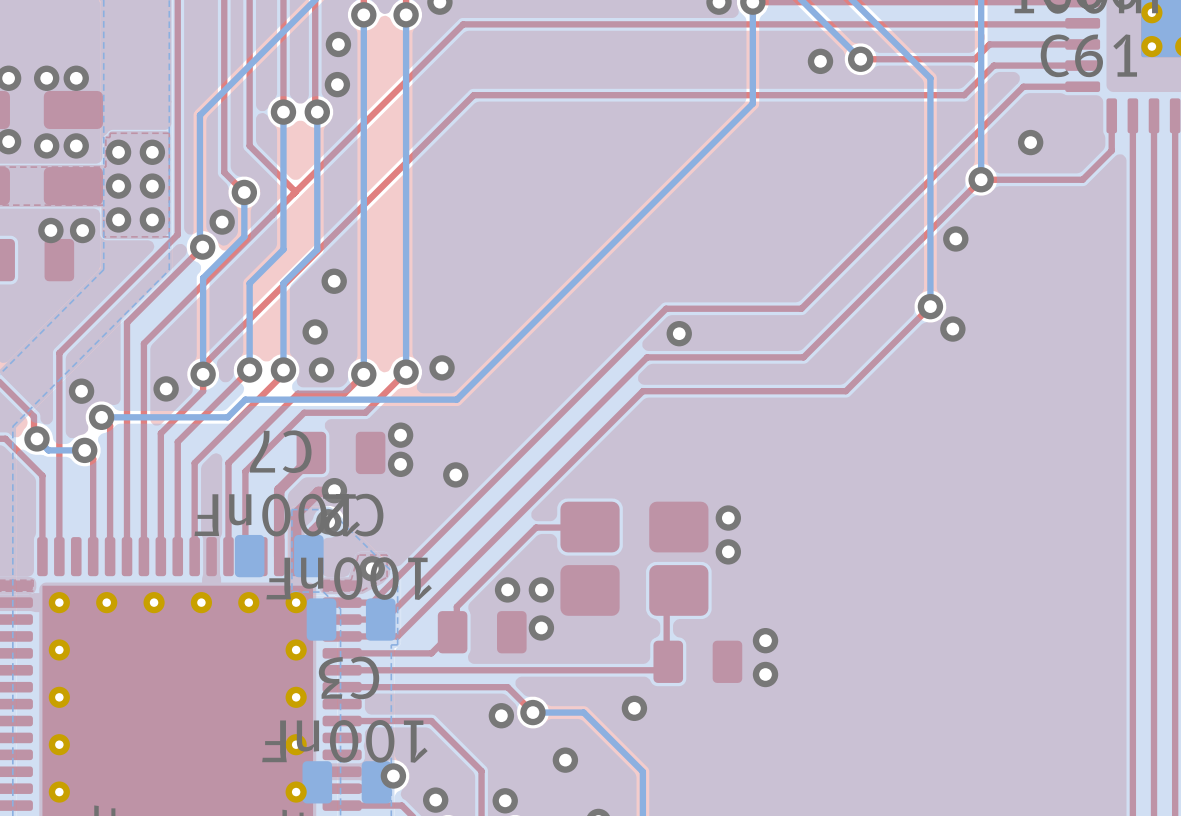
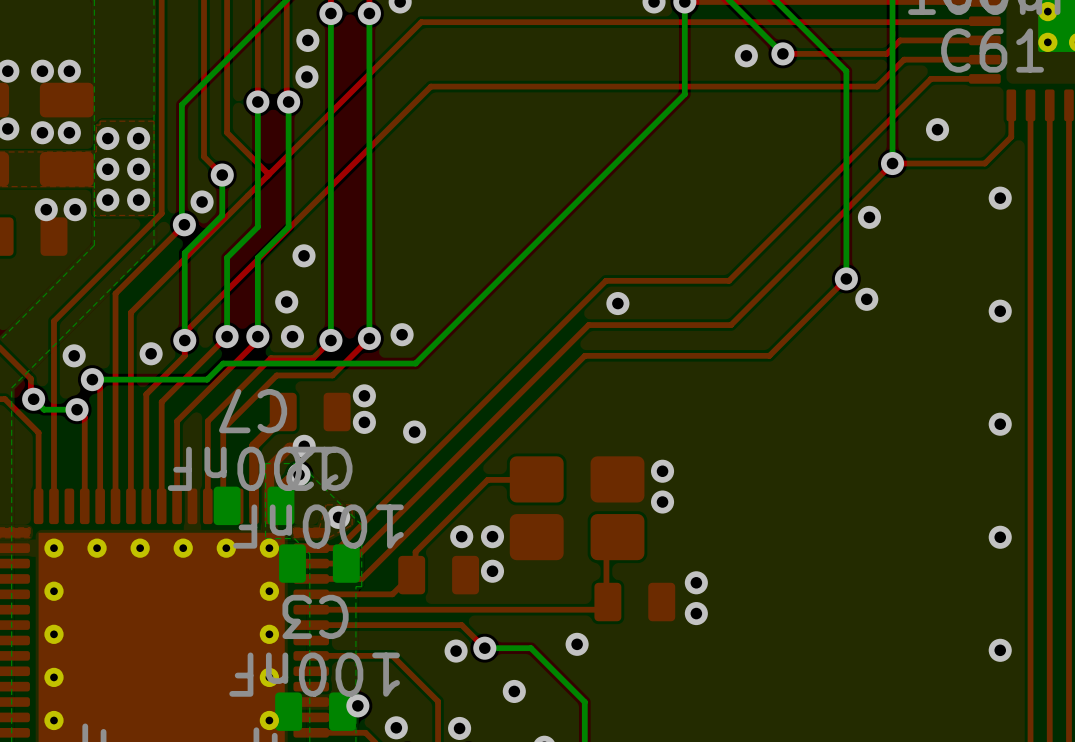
via: none -> (1000, 198)
via: none -> (1000, 311)
via: none -> (1000, 424)
via: none -> (1000, 537)
via: none -> (1000, 650)

